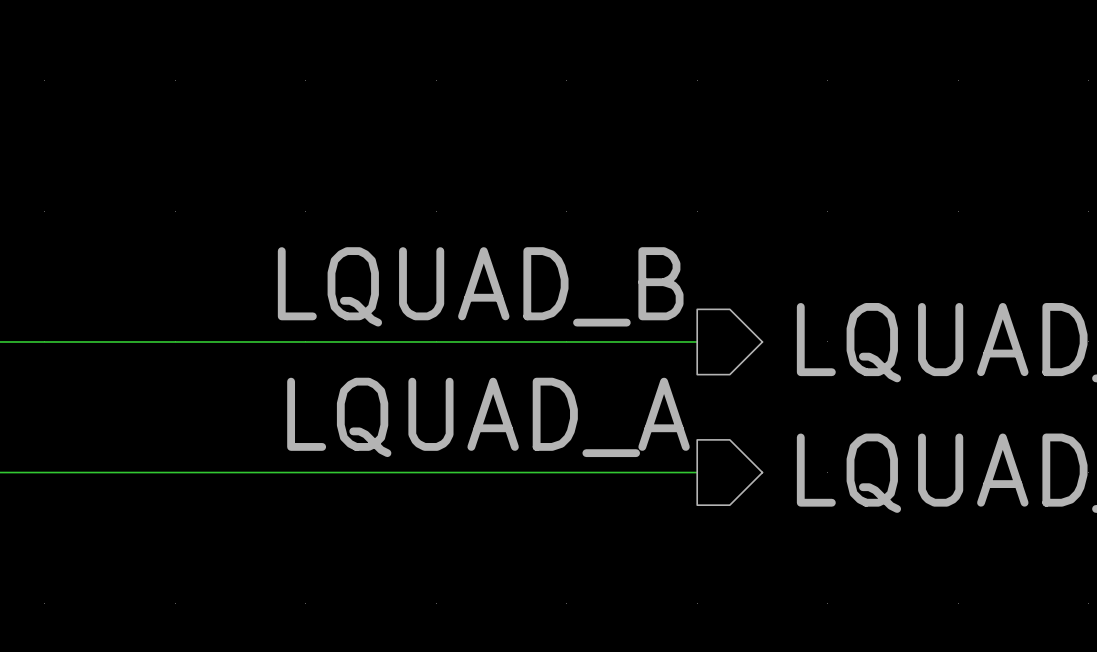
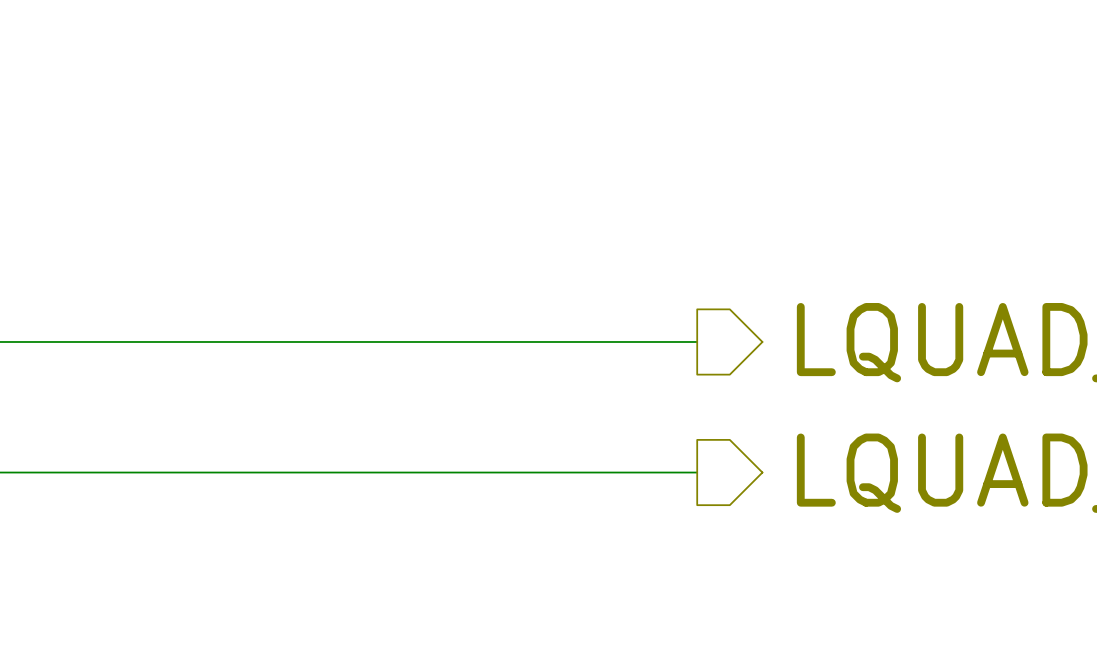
label: LQUAD_B (480, 286) -> none
label: LQUAD_A (488, 417) -> none

